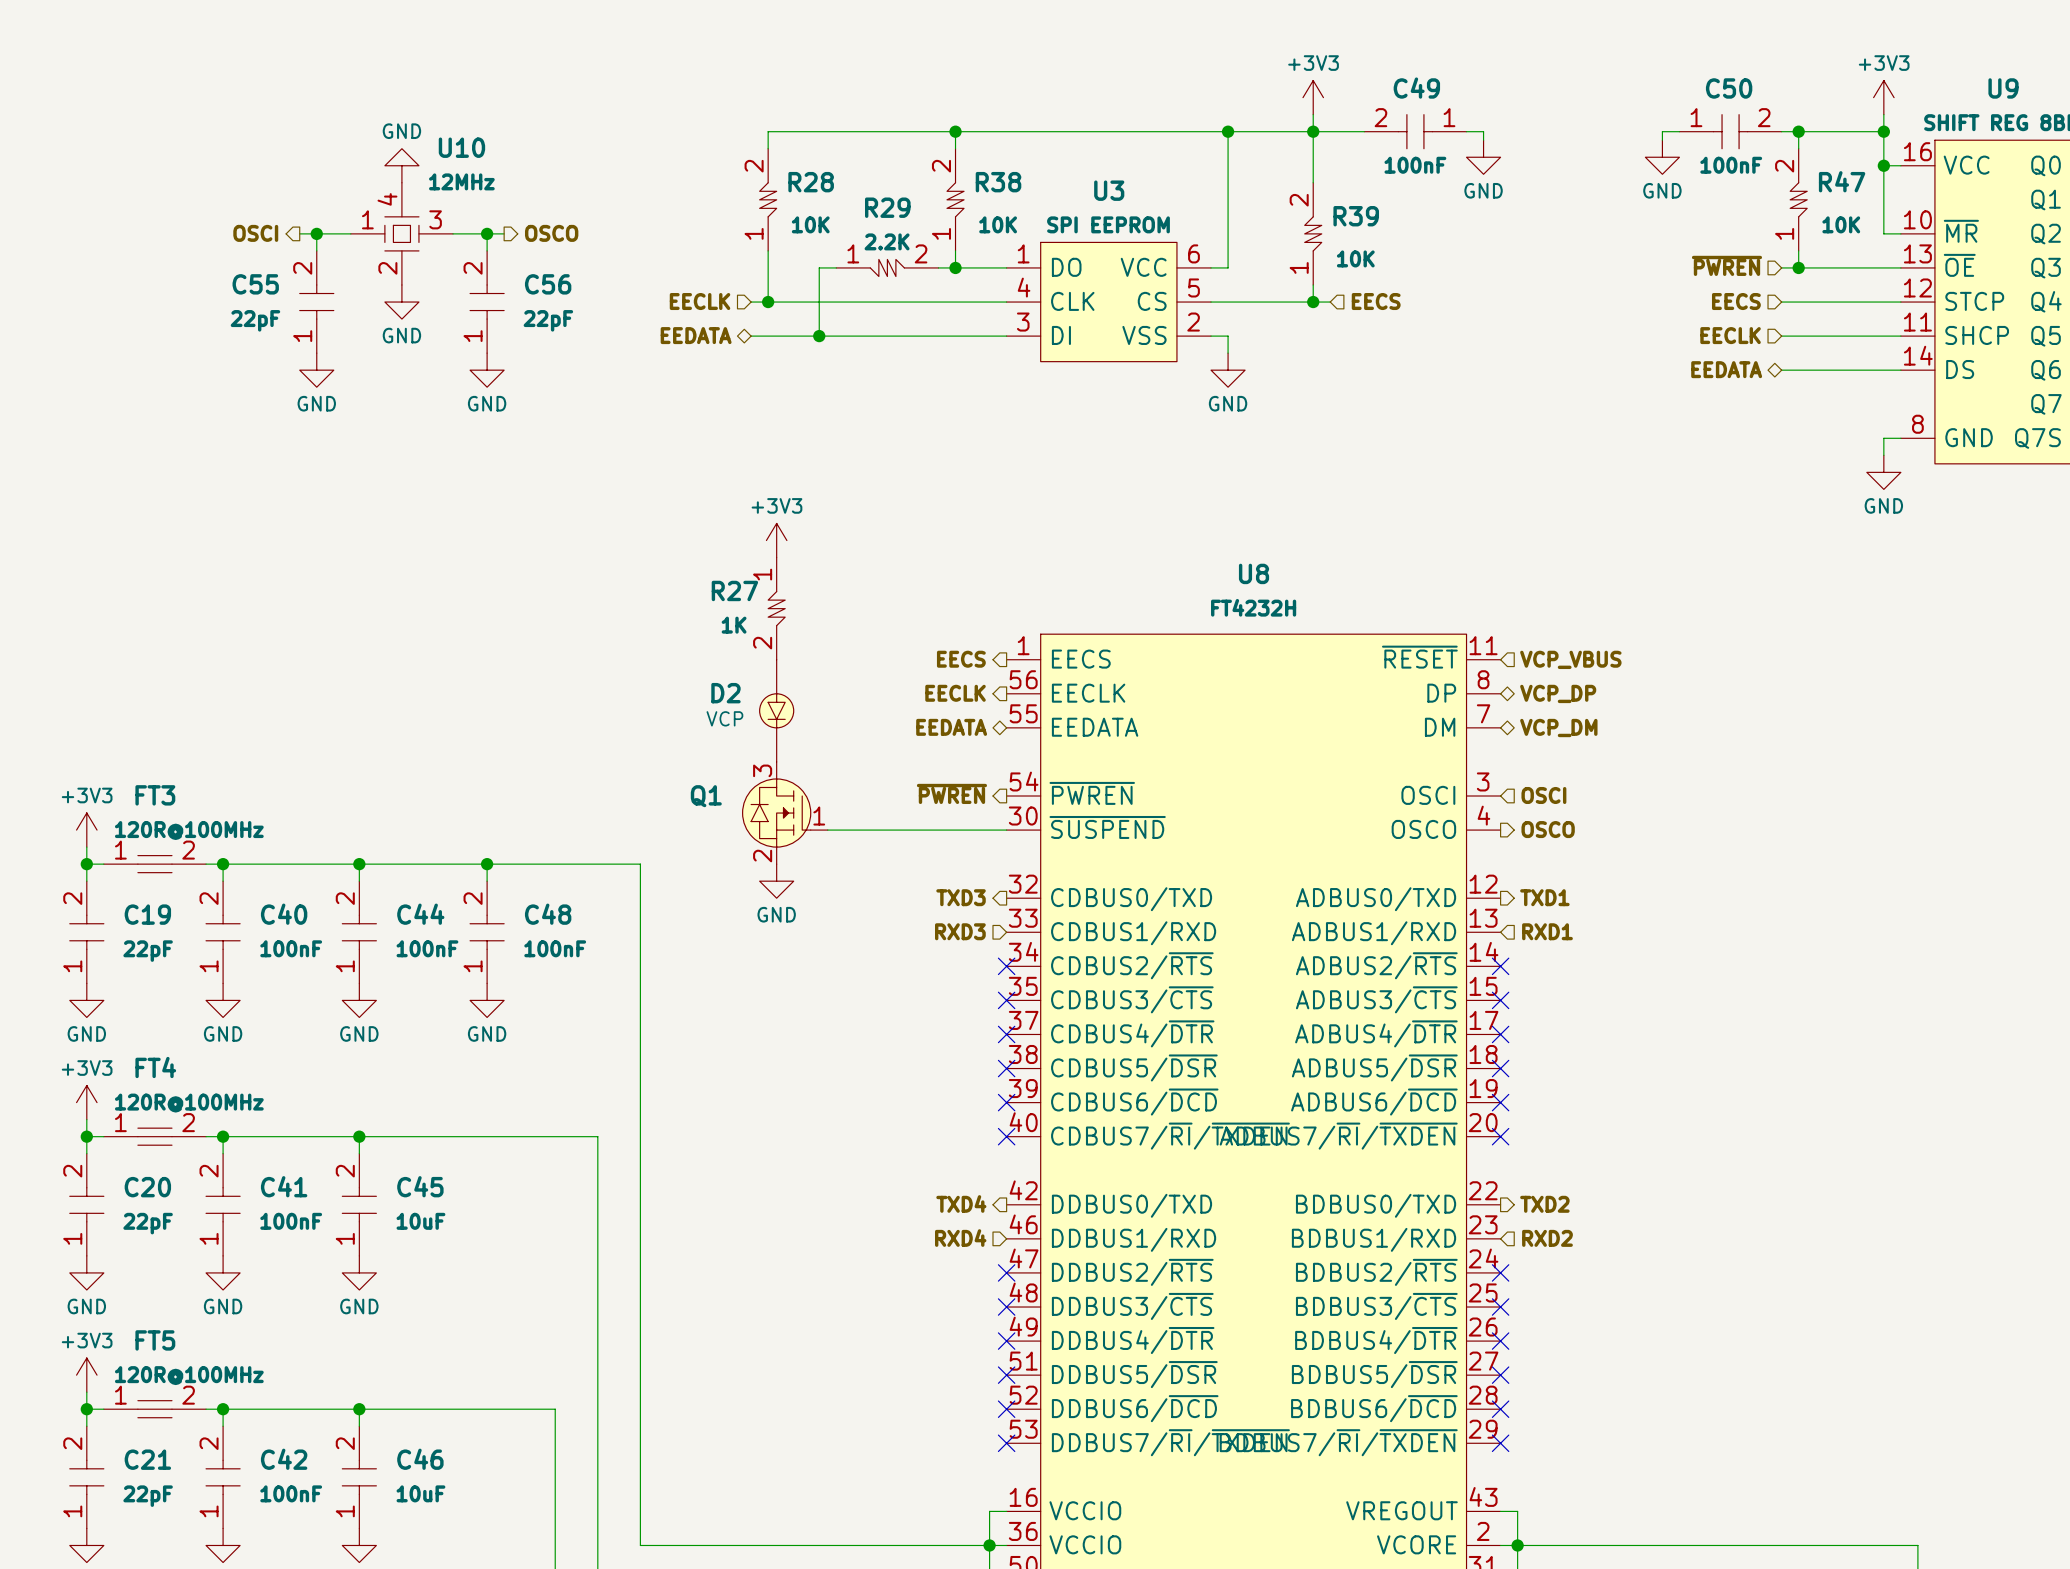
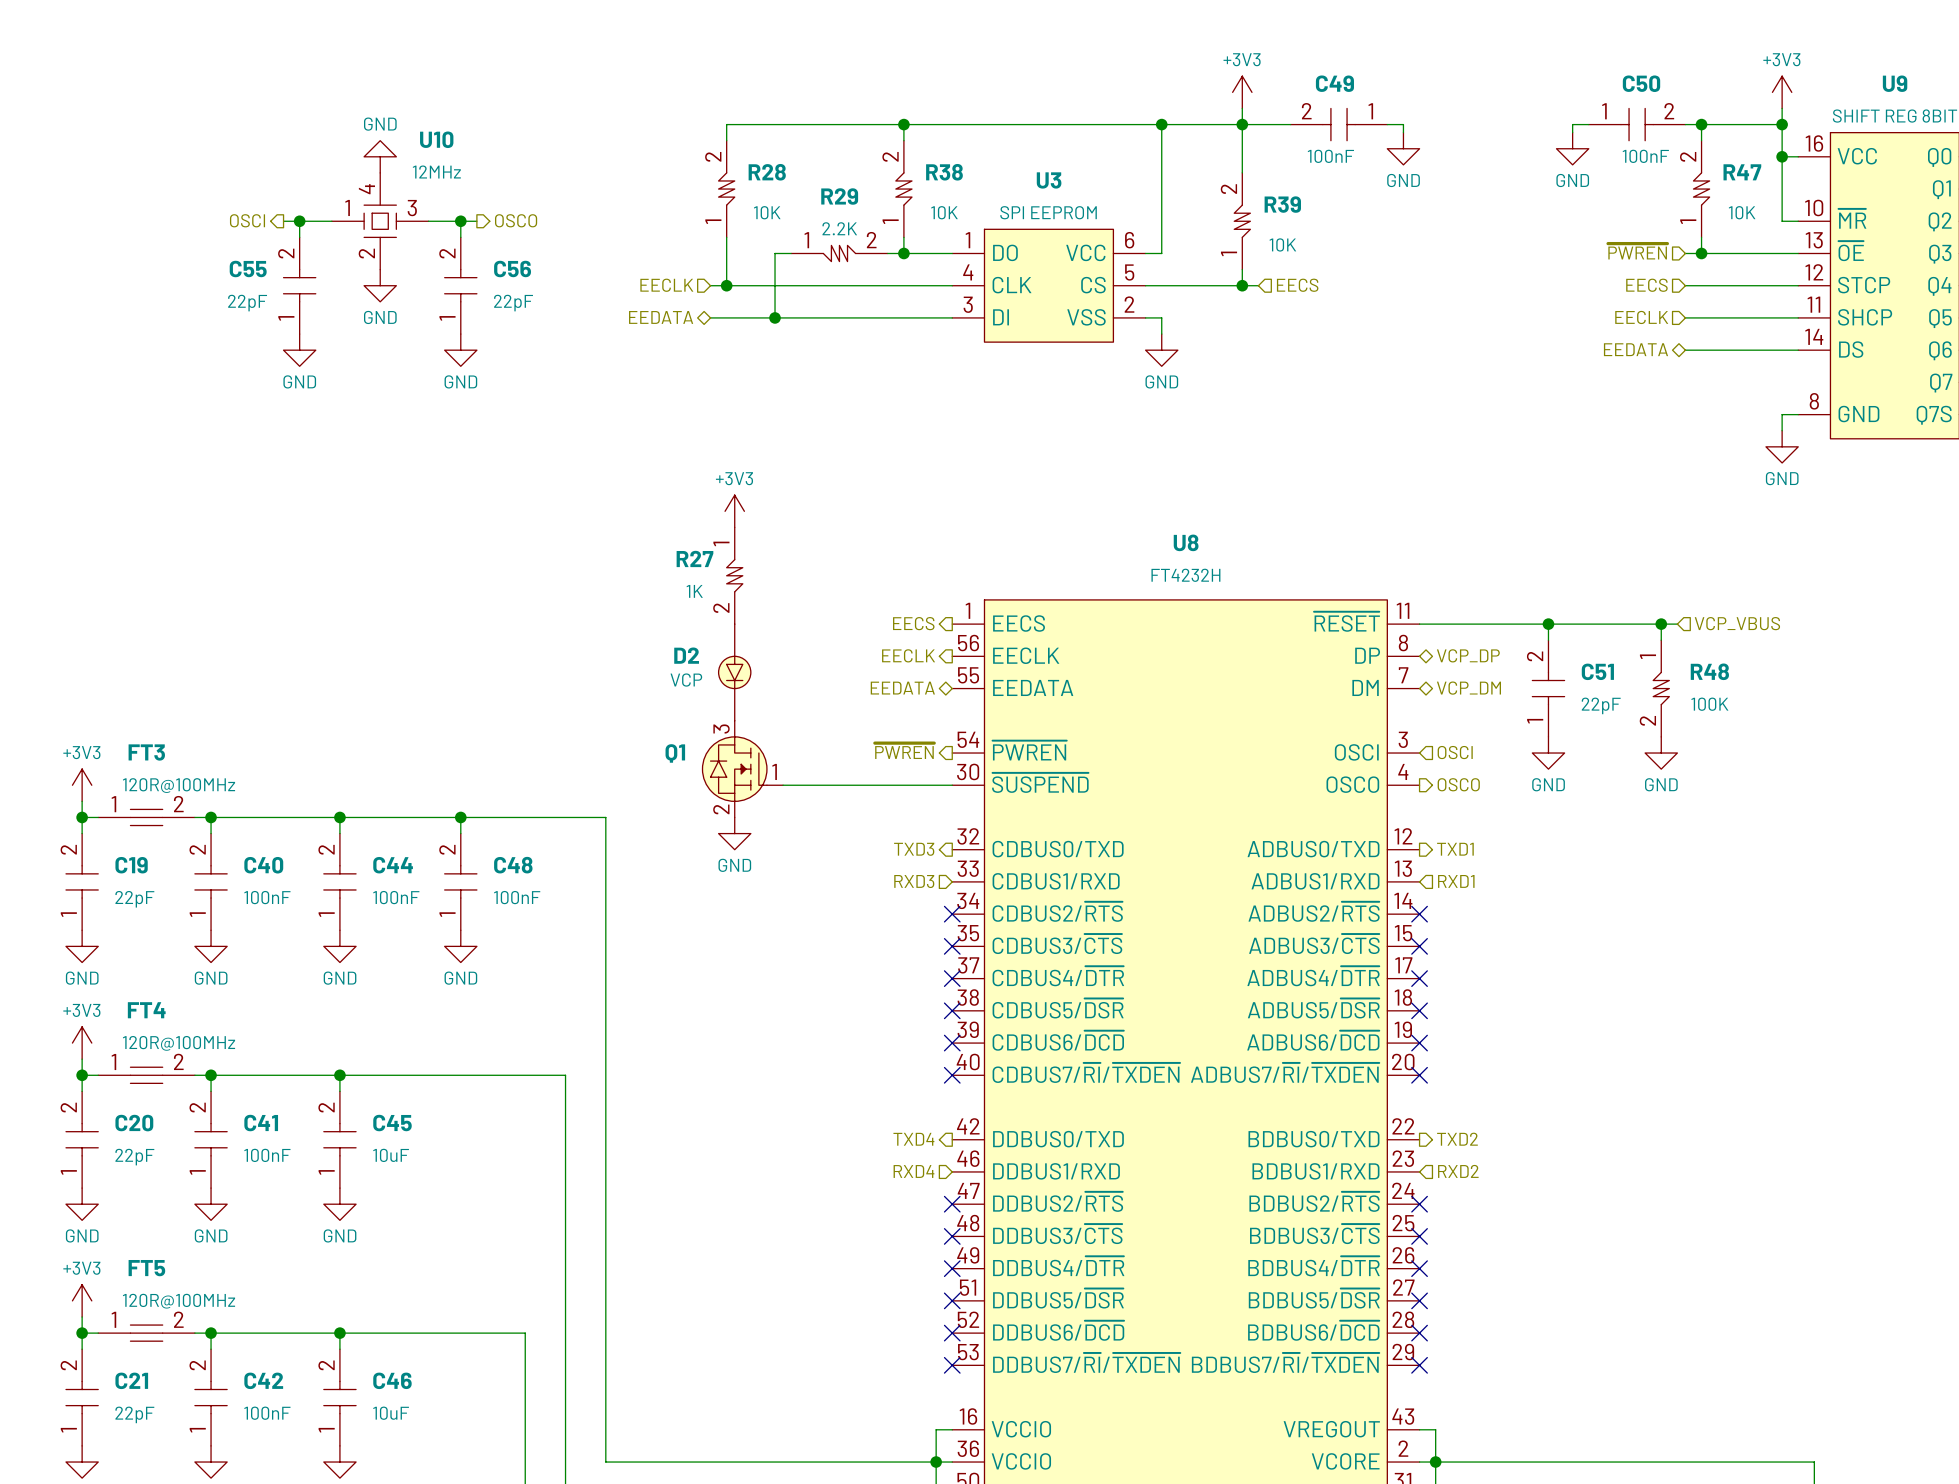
wire: none -> (1419, 624) (1677, 624)
hierarchical label position: VCP_VBUS (1570, 659) -> VCP_VBUS (1737, 623)
wire: none -> (1548, 624) (1548, 640)
junction: none -> (1548, 624)
wire: none -> (1661, 624) (1661, 640)
junction: none -> (1661, 624)
C51: none -> 22pF (1548, 688)
R48: none -> 100K (1661, 688)
power symbol: none -> GND (1548, 753)
power symbol: none -> GND (1661, 753)

